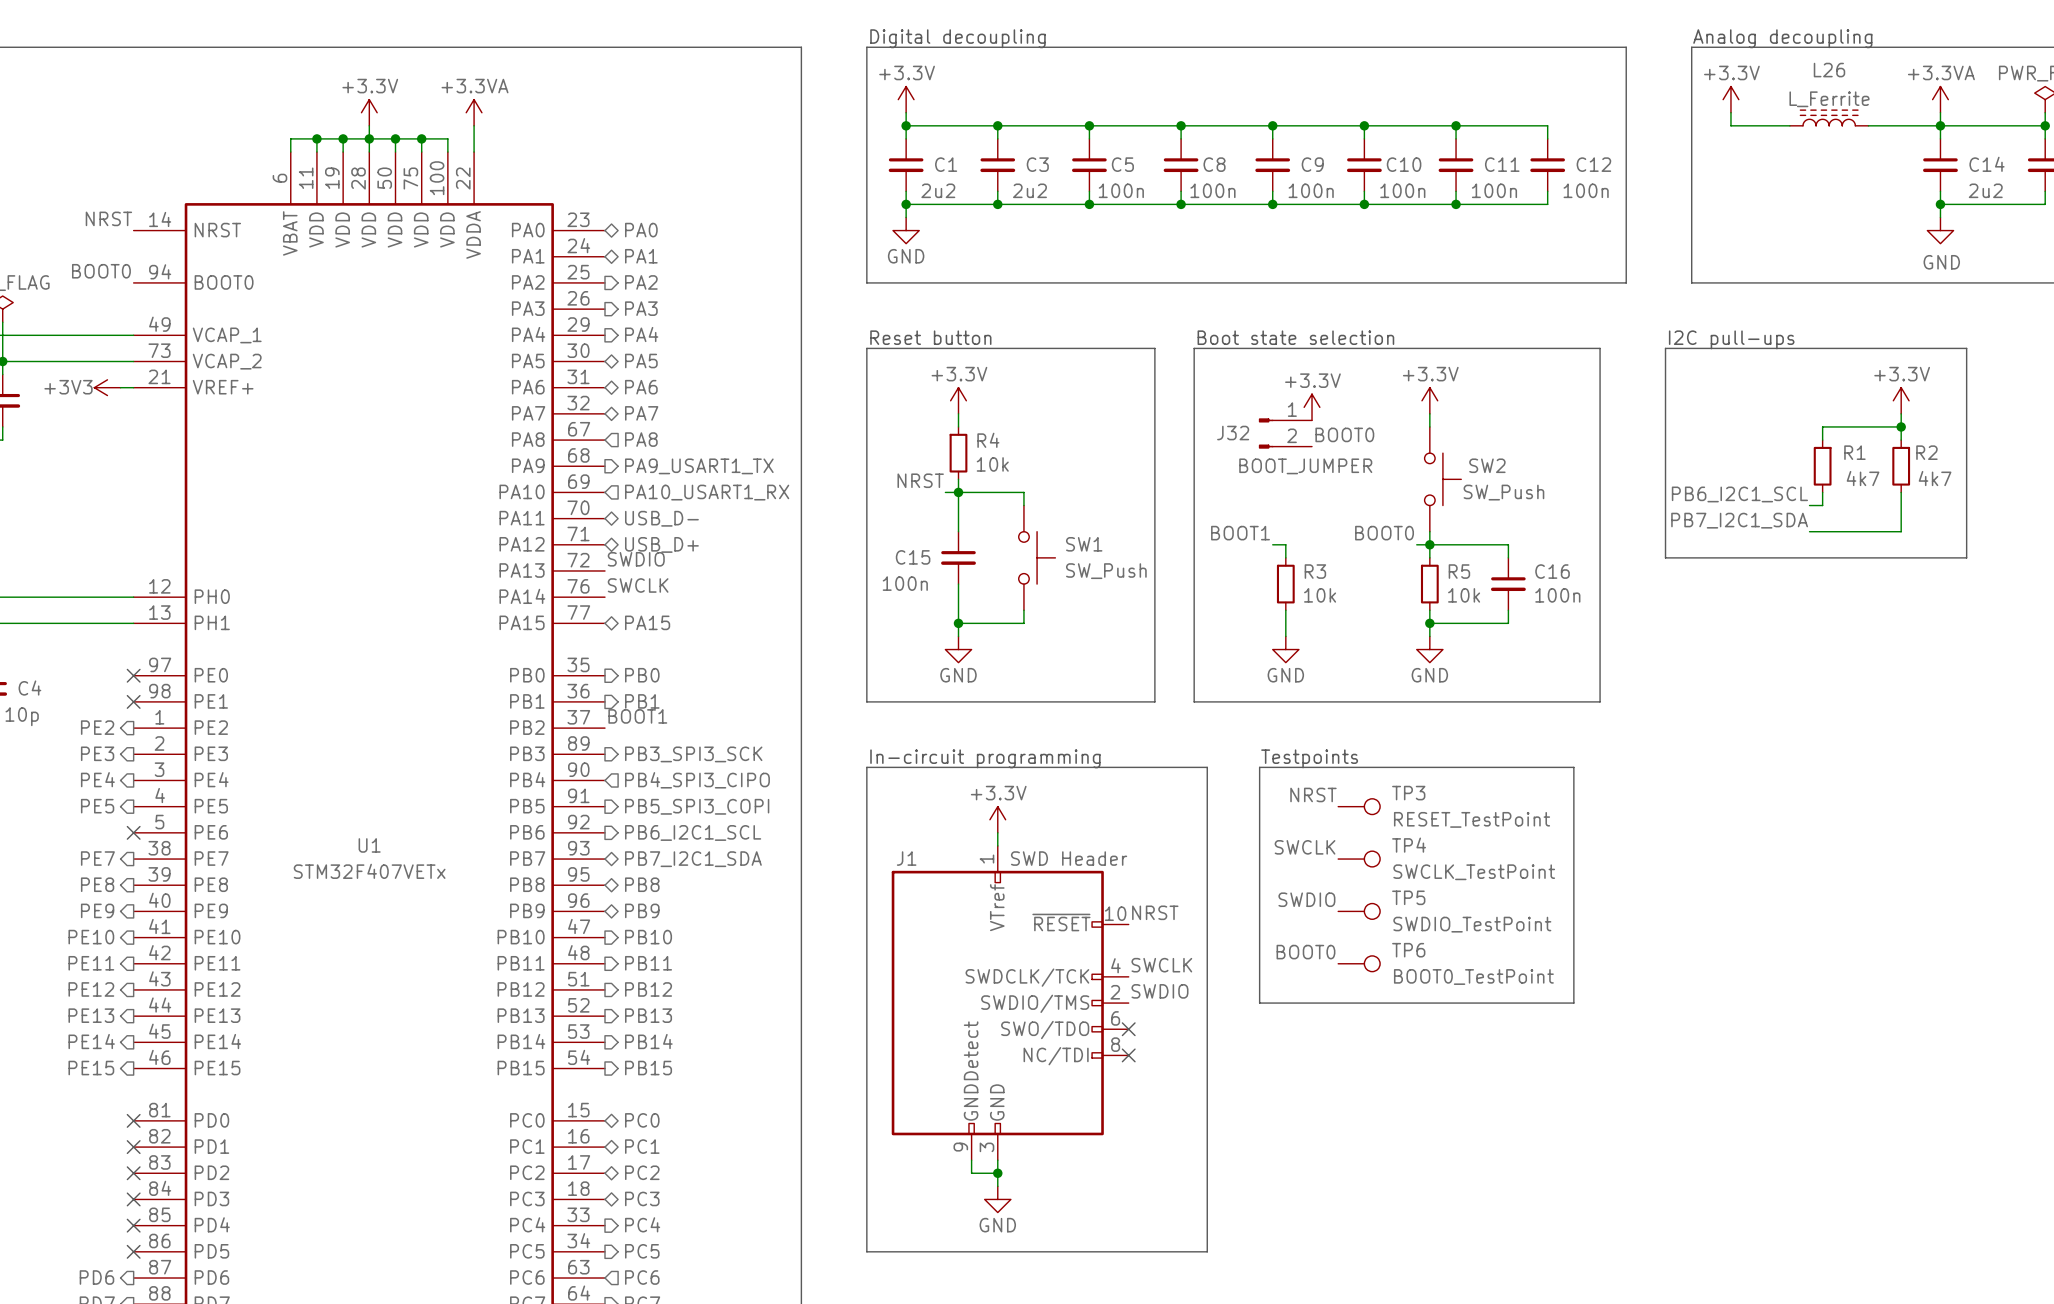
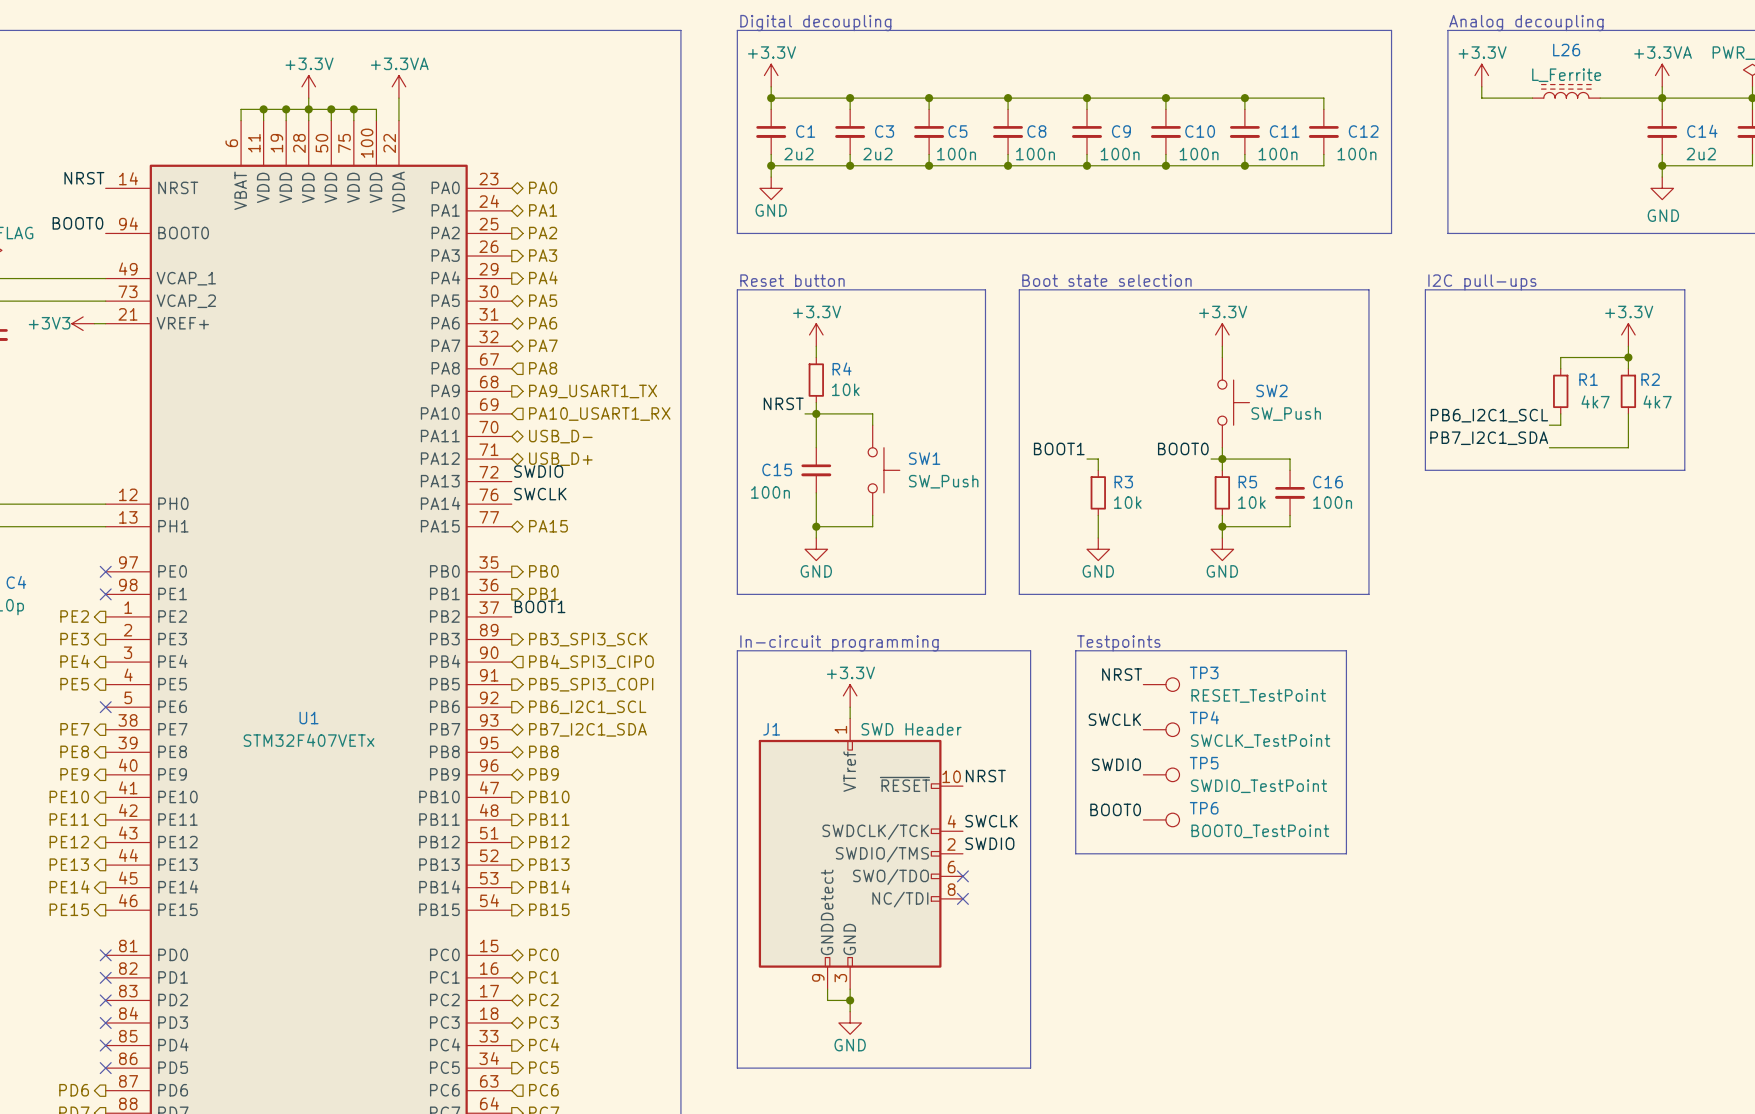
power symbol: +3.3V (1312, 407) -> none
J32: BOOT_JUMPER (1285, 433) -> none
label: BOOT0 (1344, 434) -> none

